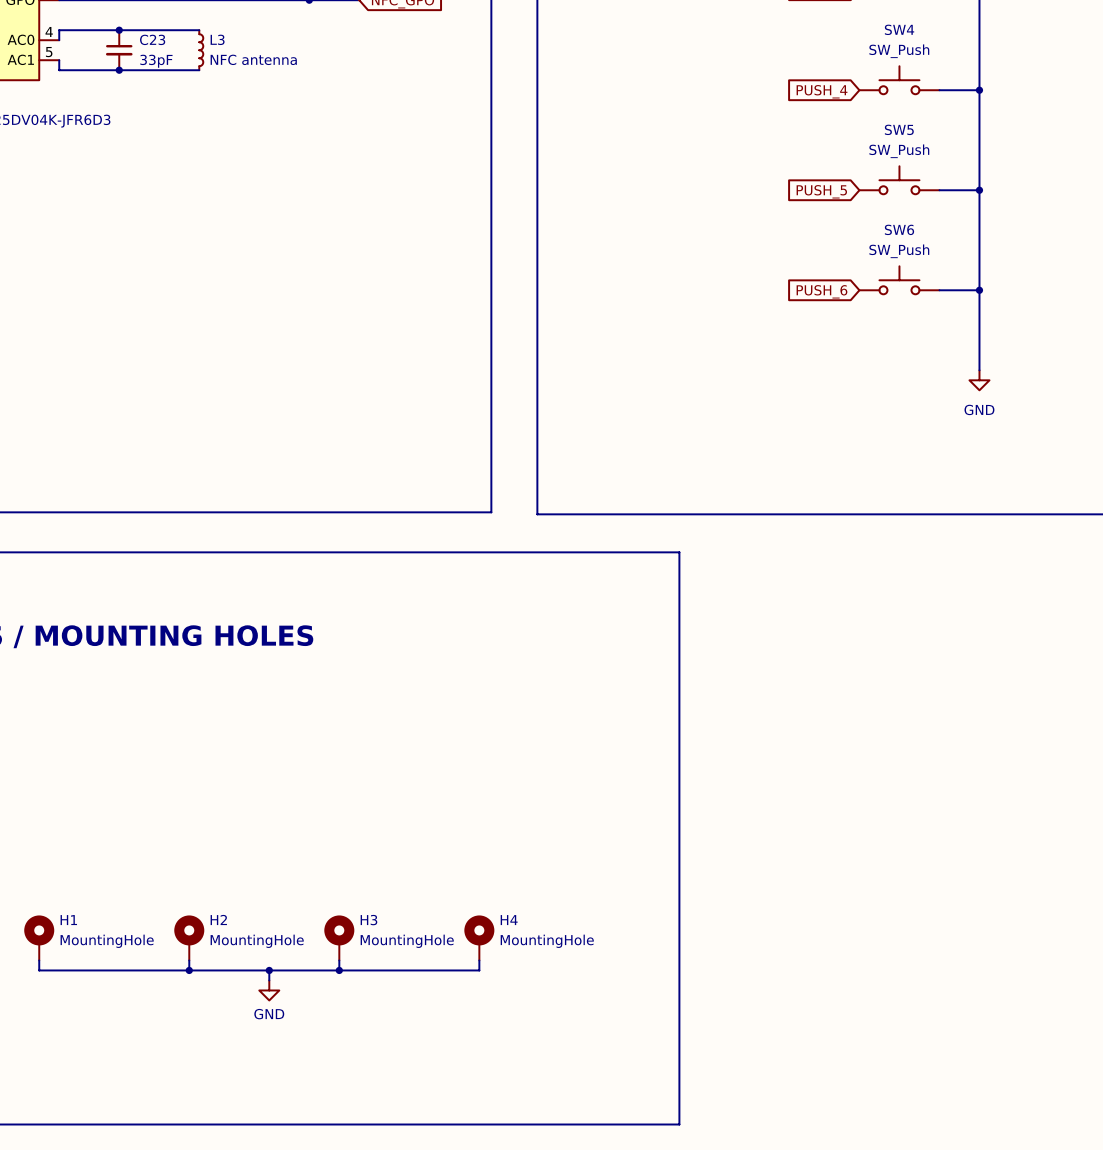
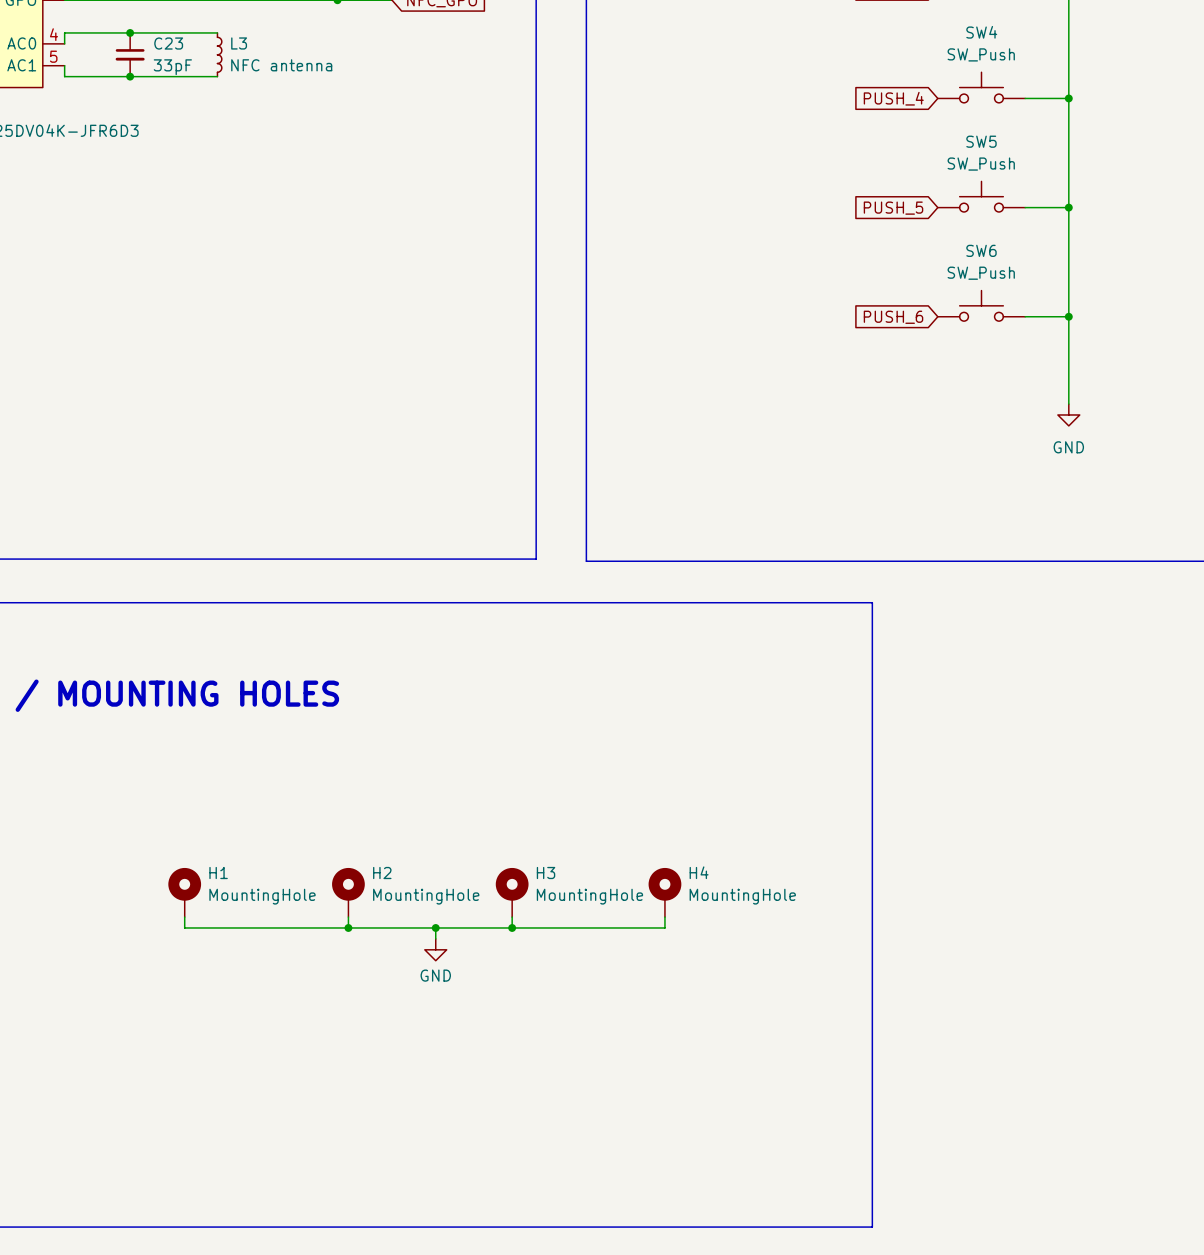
line: (679, 552) (679, 1124) -> (741, 602) (872, 602) (872, 1227) (741, 1227)
junction: none -> (348, 927)
junction: none -> (435, 927)
junction: none -> (512, 927)
H1 position: (39, 937) -> (184, 892)
H2 position: (189, 937) -> (348, 892)
H3 position: (339, 937) -> (512, 892)
H4 position: (479, 937) -> (664, 892)
wire: (39, 960) (39, 970) (479, 970) (479, 960) -> (184, 917) (184, 927) (664, 927) (664, 917)
wire: (189, 960) (189, 970) -> (348, 917) (348, 927)
wire: (339, 960) (339, 970) -> (512, 917) (512, 927)
junction: (189, 970) -> none
wire: (269, 970) (269, 980) -> (435, 927) (435, 938)
junction: (269, 970) -> none
junction: (339, 970) -> none
power symbol position: GND (269, 990) -> GND (435, 949)

